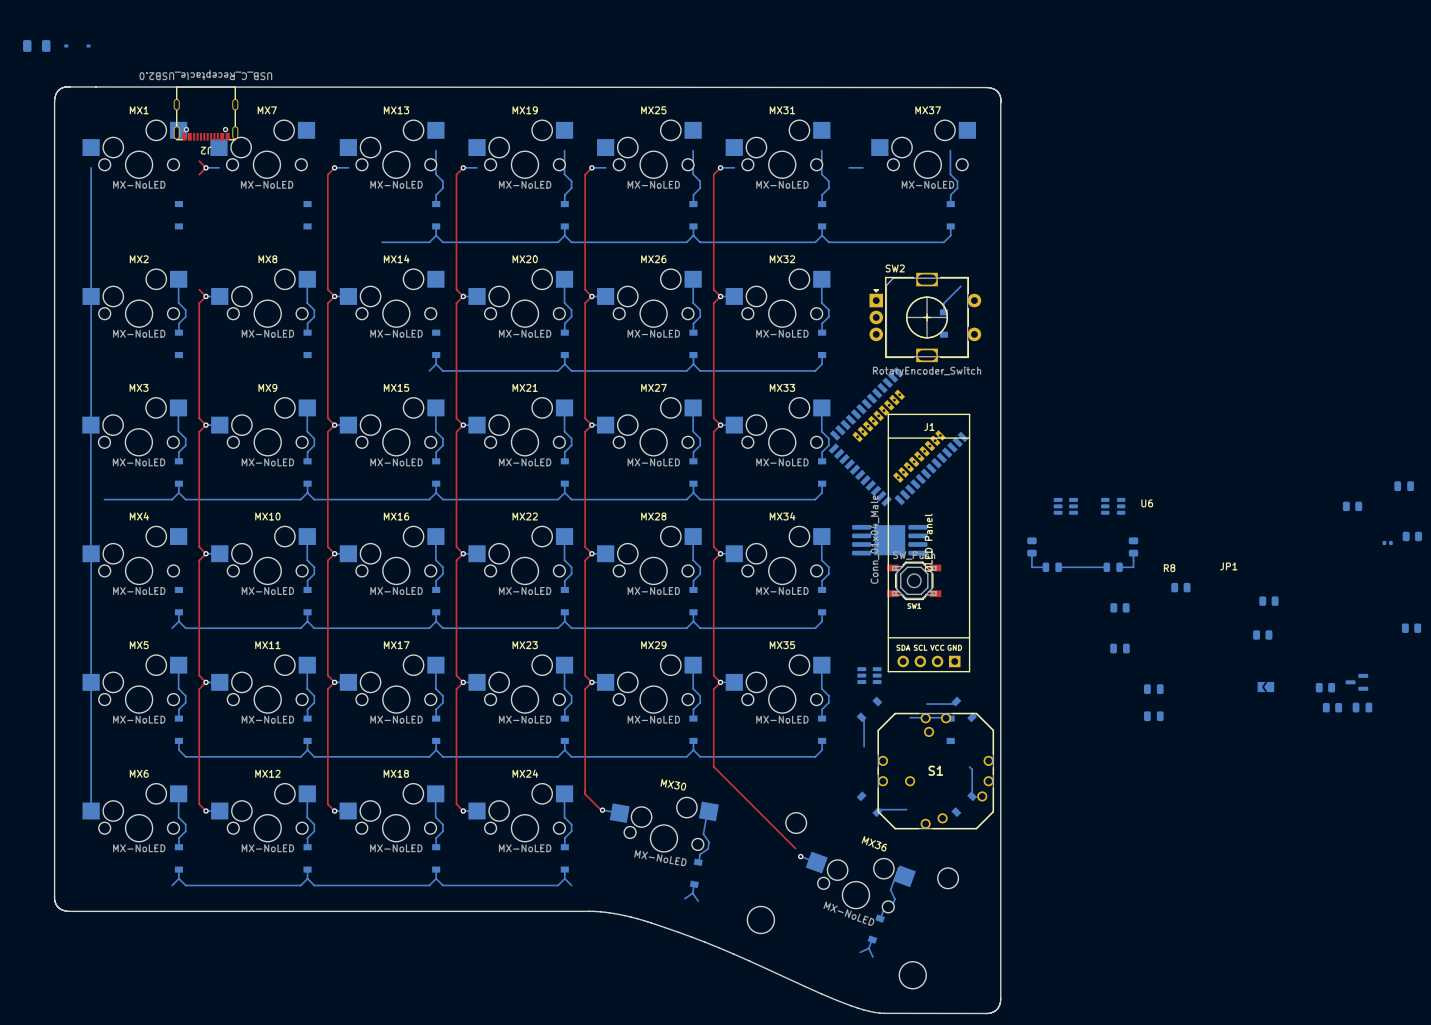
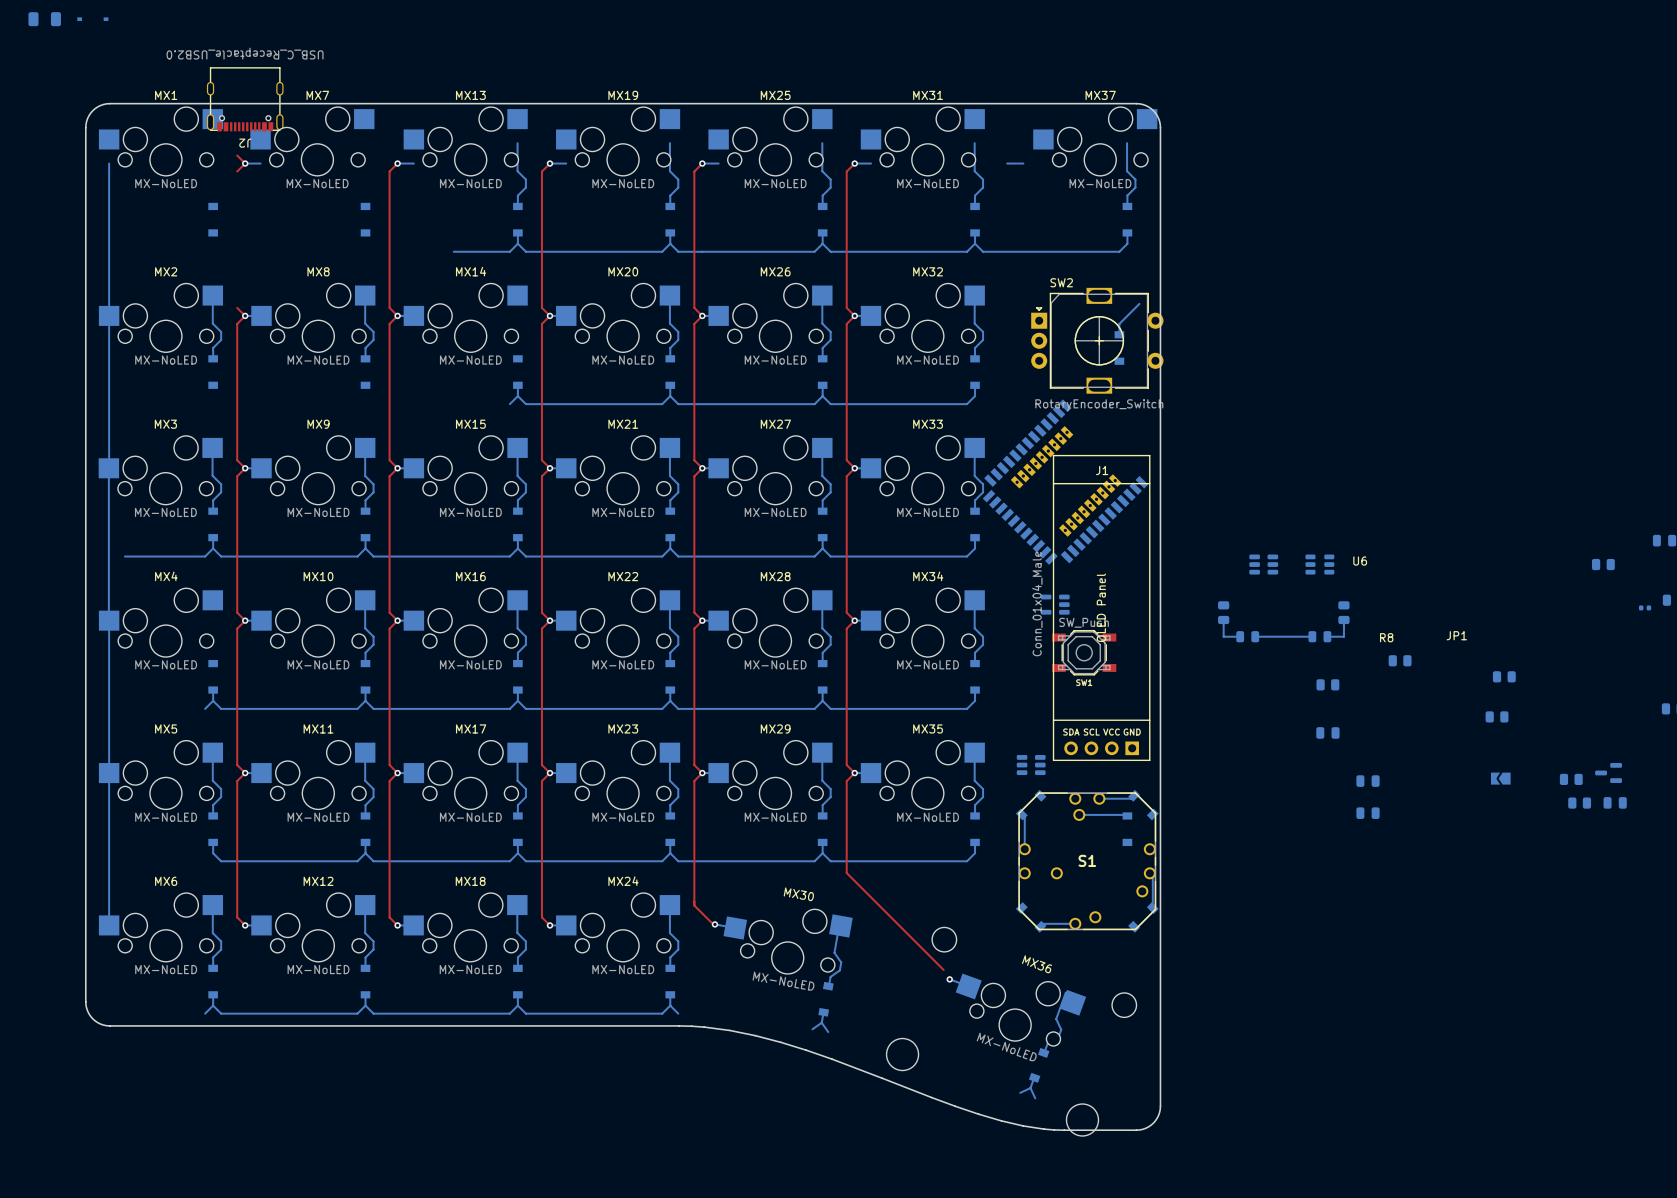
board edge: (67, 86) (58, 90) (54, 102) (54, 897) (58, 907) (69, 911) (605, 912) (637, 918) (691, 937) (836, 1000) (869, 1011) (884, 1013) (986, 1013) (996, 1009) (1000, 998) (1000, 100) (997, 91) (985, 87) (67, 86) -> (109, 103) (100, 105) (92, 110) (87, 118) (85, 127) (85, 1001) (87, 1011) (92, 1018) (100, 1024) (109, 1025) (704, 1027) (755, 1035) (806, 1050) (955, 1106) (1023, 1125) (1054, 1129) (1136, 1130) (1145, 1128) (1153, 1123) (1158, 1115) (1160, 1106) (1160, 127) (1158, 118) (1153, 110) (1145, 105) (1136, 103) (109, 103)
part footprint: [852, 524, 928, 556] -> [1040, 594, 1070, 615]
S1 position: (935, 771) -> (1087, 861)

